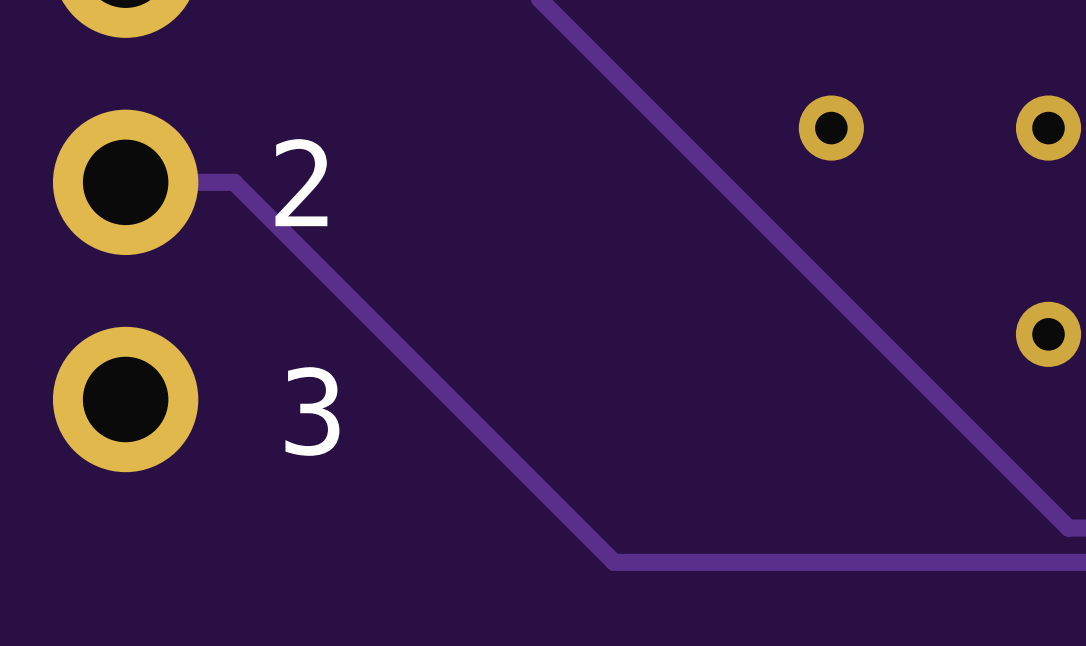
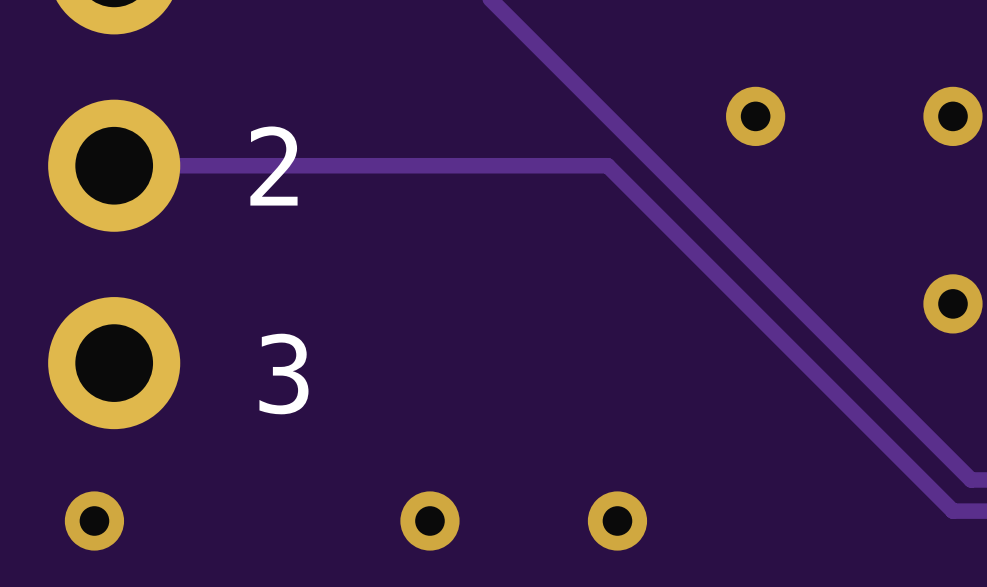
track: (234, 182) (614, 562) (1048, 562) -> (212, 165) (607, 165) (952, 511)
via: none -> (94, 520)
via: none -> (429, 520)
via: none -> (617, 520)

